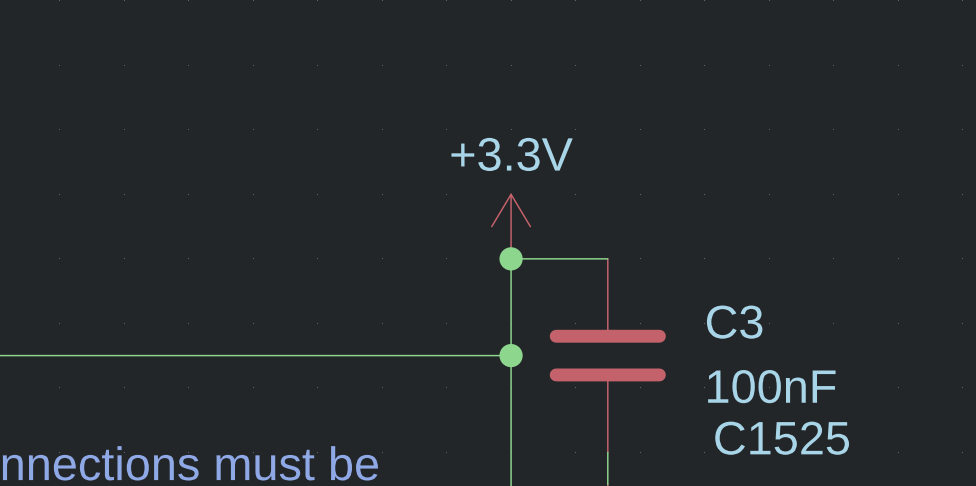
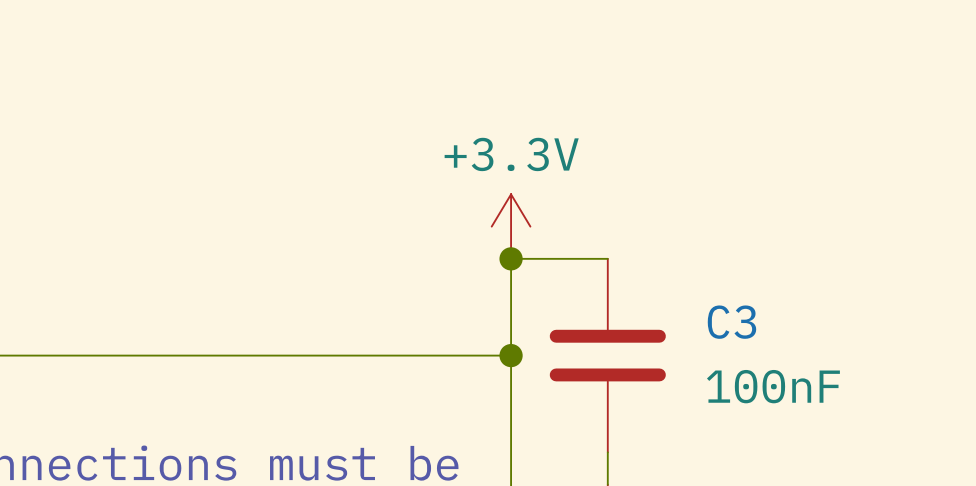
C3 text: C1525 (782, 438) -> none

